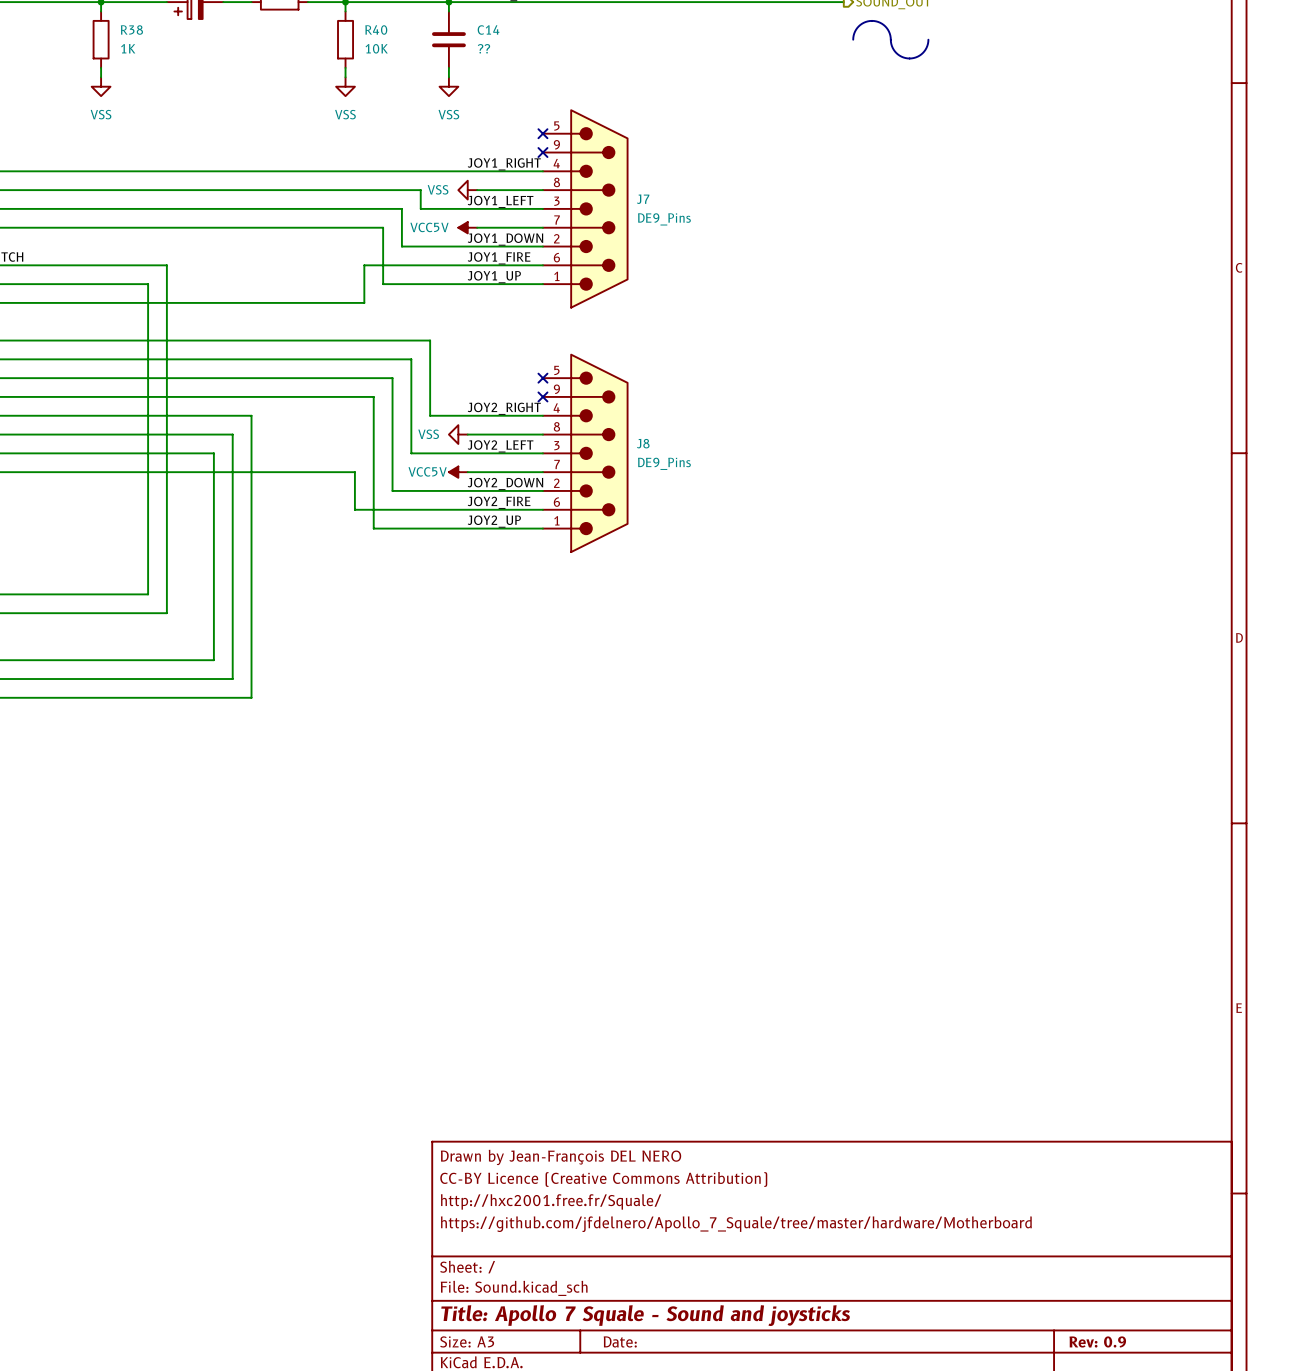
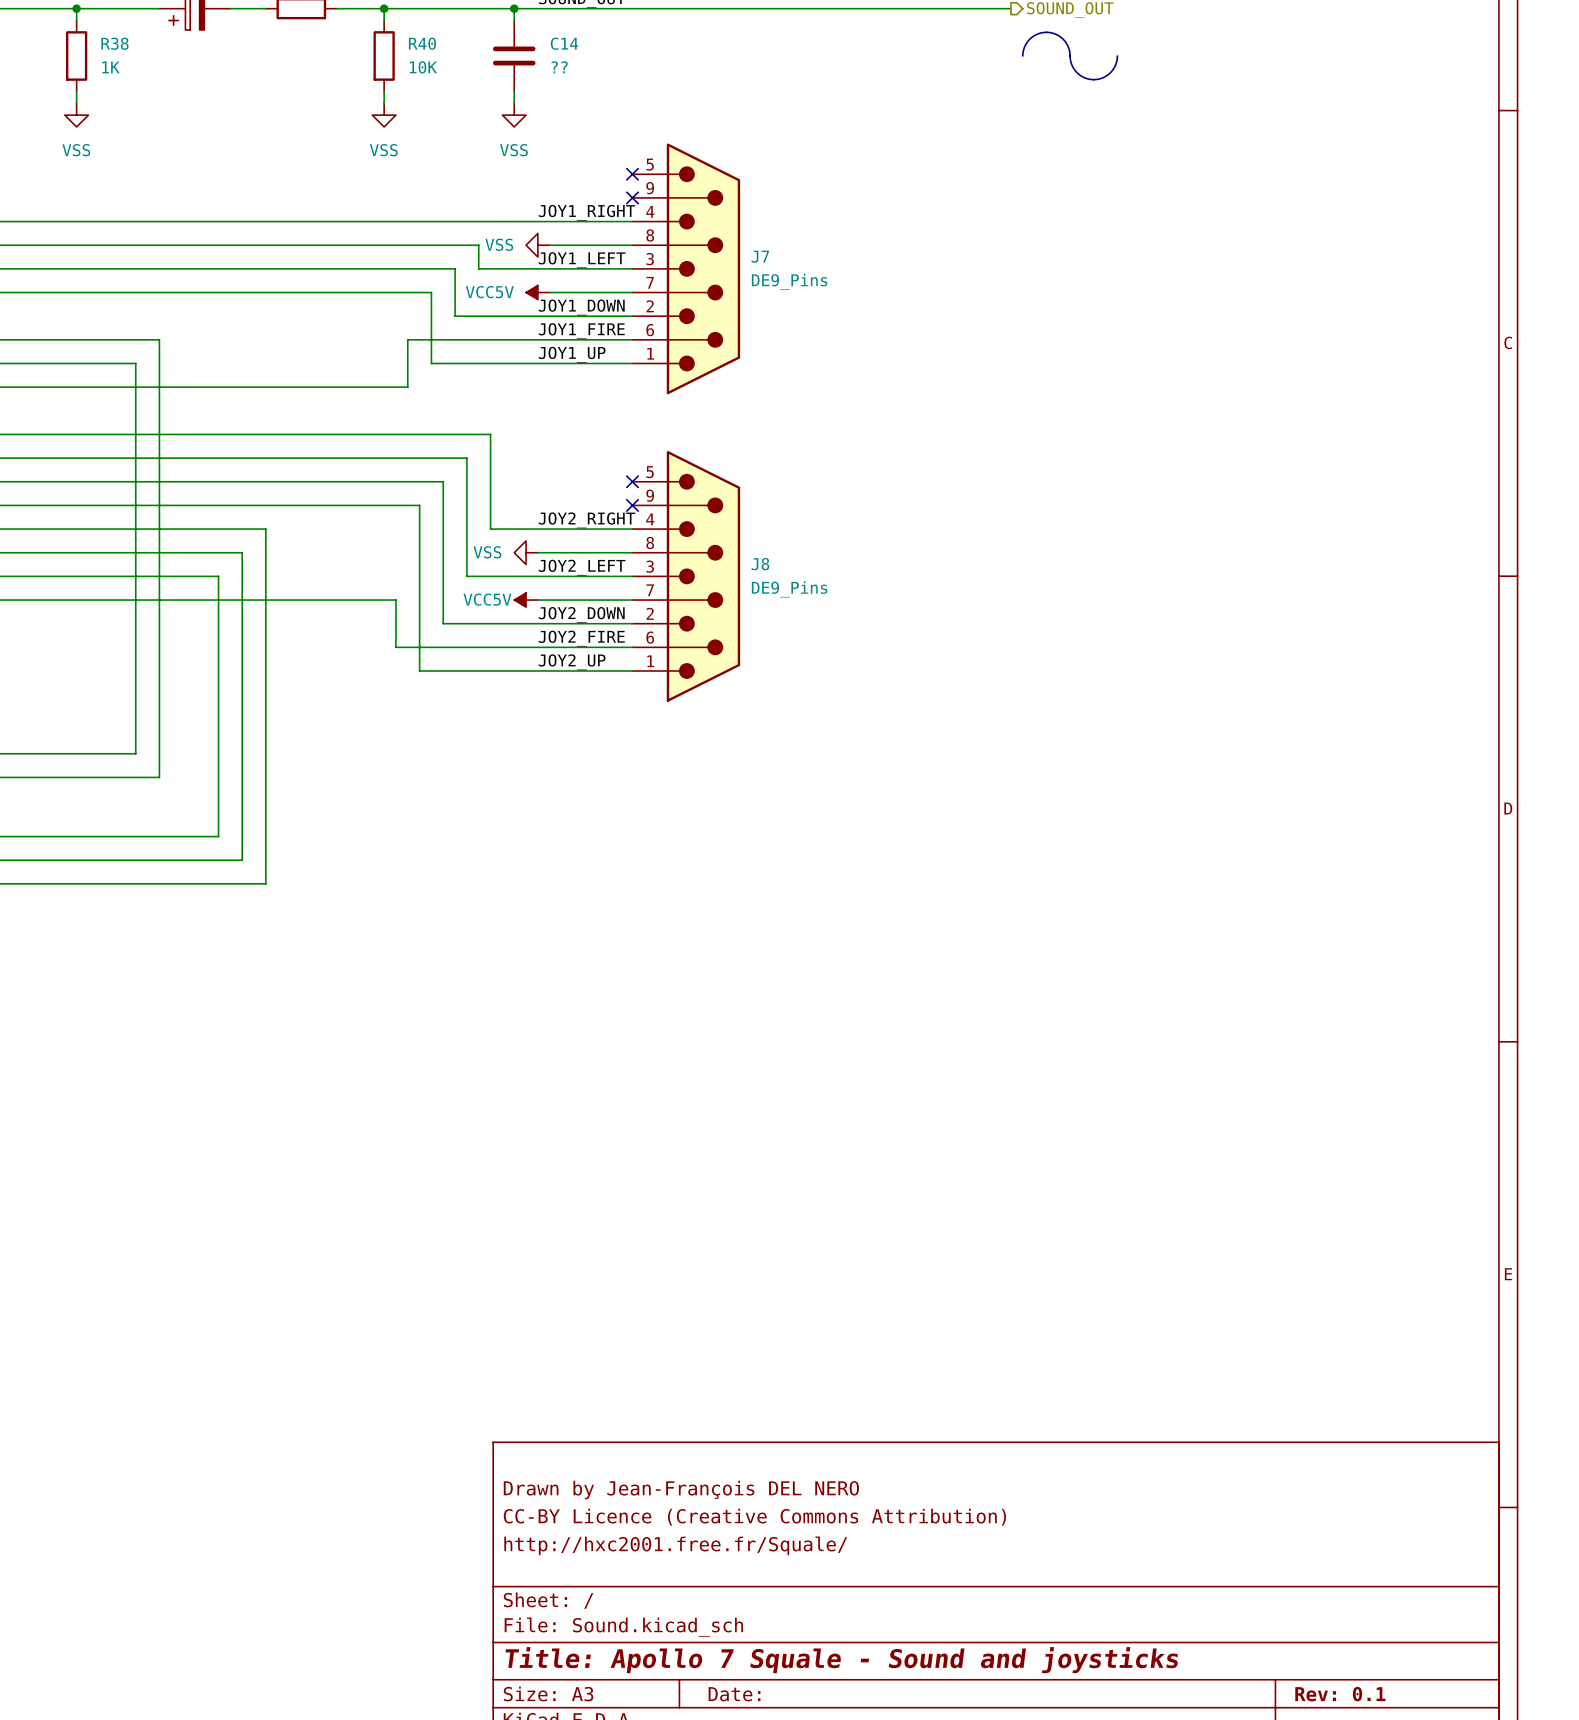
title block: Drawn by Jean-François DEL NERO (561, 1157) -> none
title block: CC-BY Licence (Creative Commons Attribution) (603, 1179) -> Drawn by Jean-François DEL NERO (681, 1490)
title block: http://hxc2001.free.fr/Squale/ (551, 1201) -> CC-BY Licence (Creative Commons Attribution) (754, 1517)
title block: https://github.com/jfdelnero/Apollo_7_Squale/tree/master/hardware/Motherboard (736, 1224) -> http://hxc2001.free.fr/Squale/ (675, 1545)
title block: Rev: 0.9 (1097, 1342) -> Rev: 0.1 (1340, 1694)

